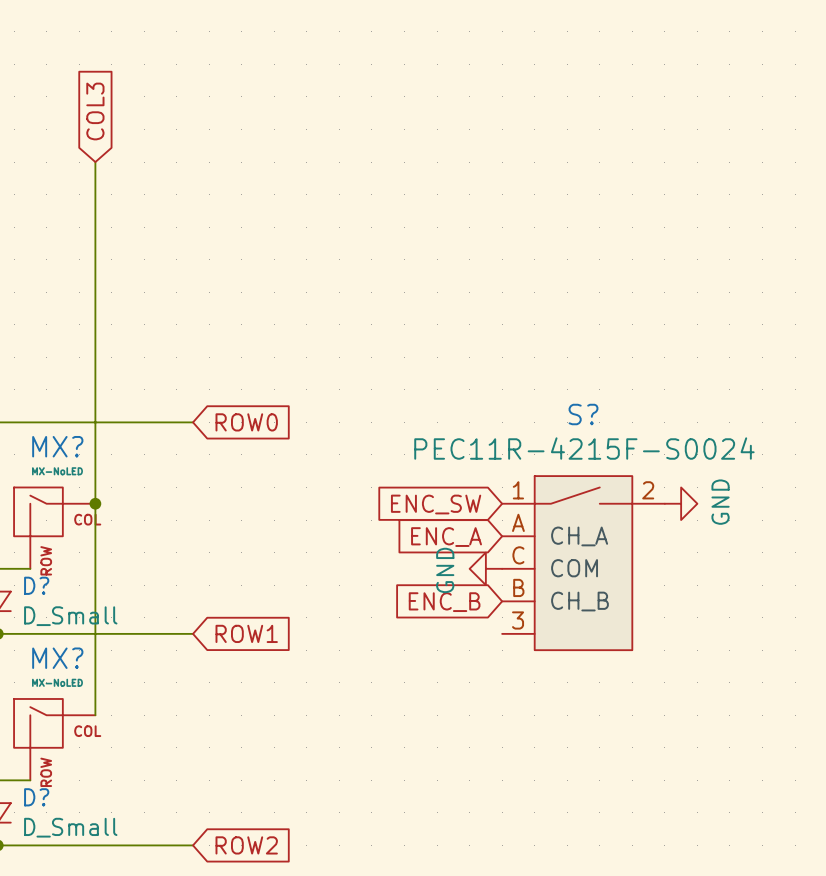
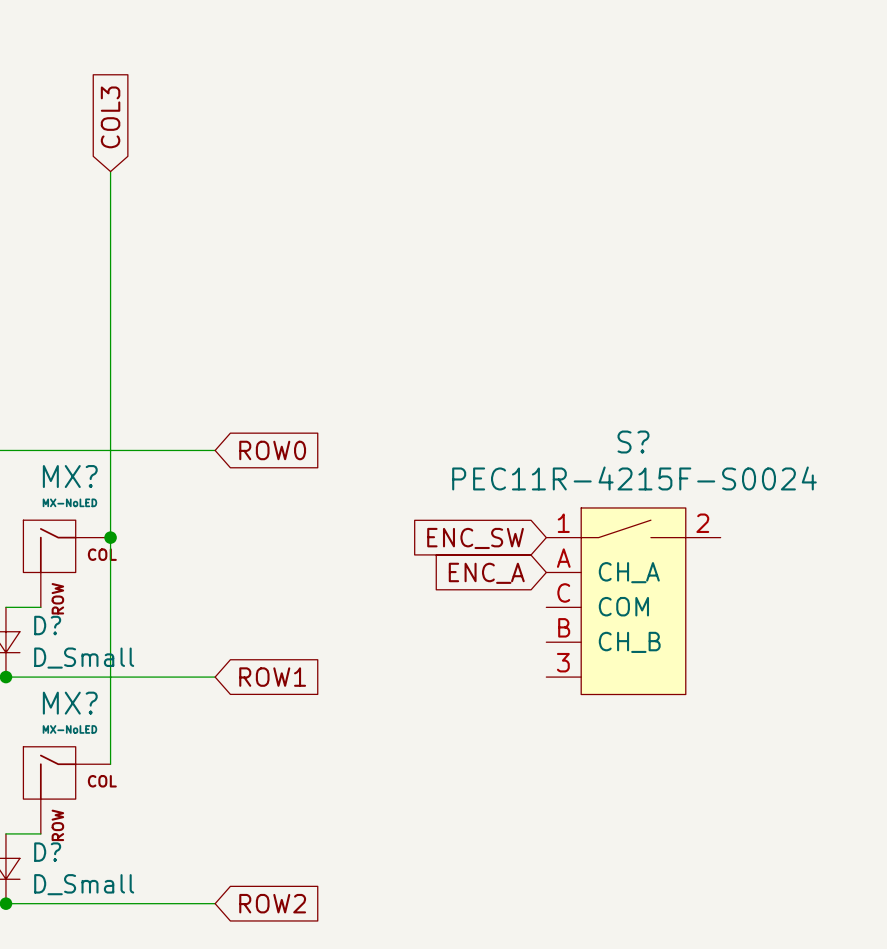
power symbol: GND (681, 503) -> none
power symbol: GND (485, 568) -> none
global label: ENC_B (444, 602) -> none

